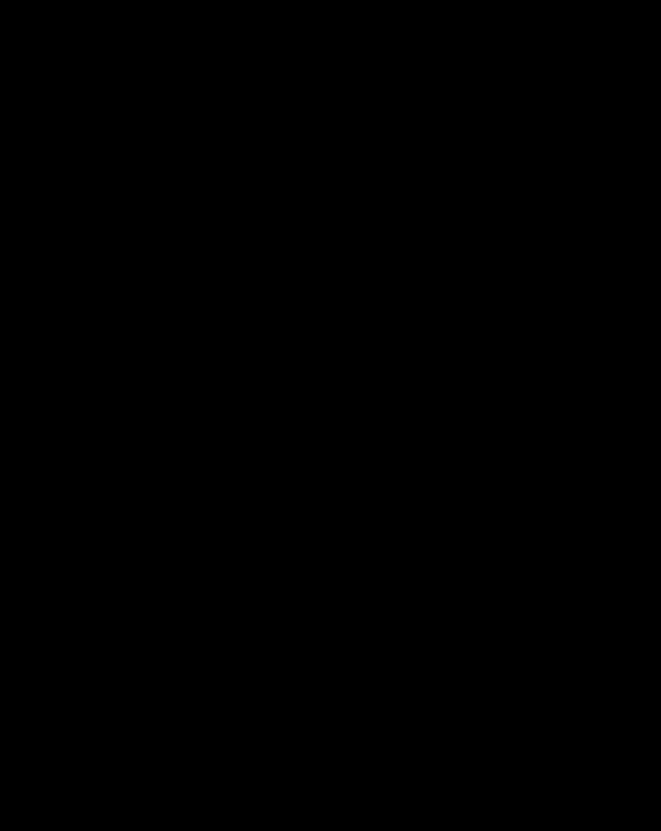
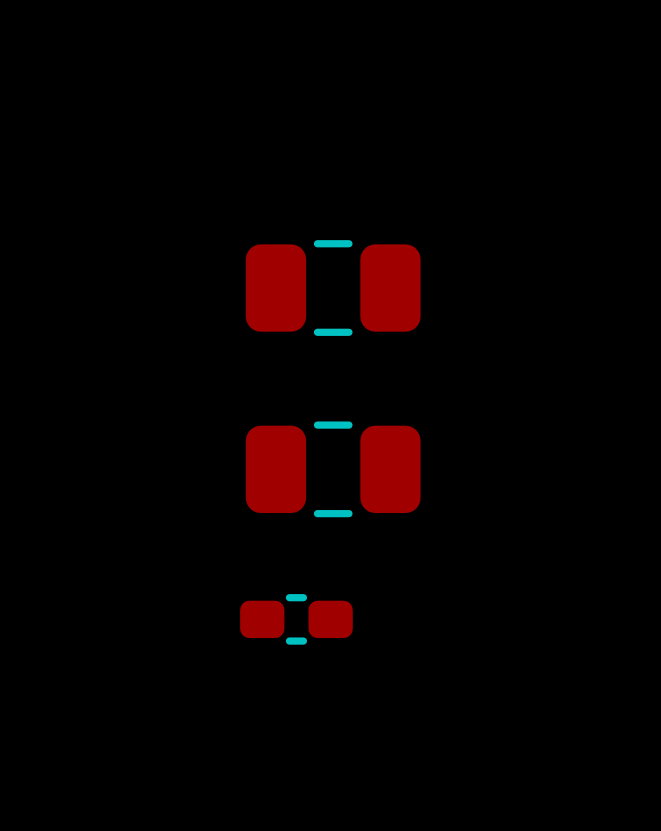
part: none -> (333, 288)
part: none -> (333, 469)
part: none -> (296, 619)

